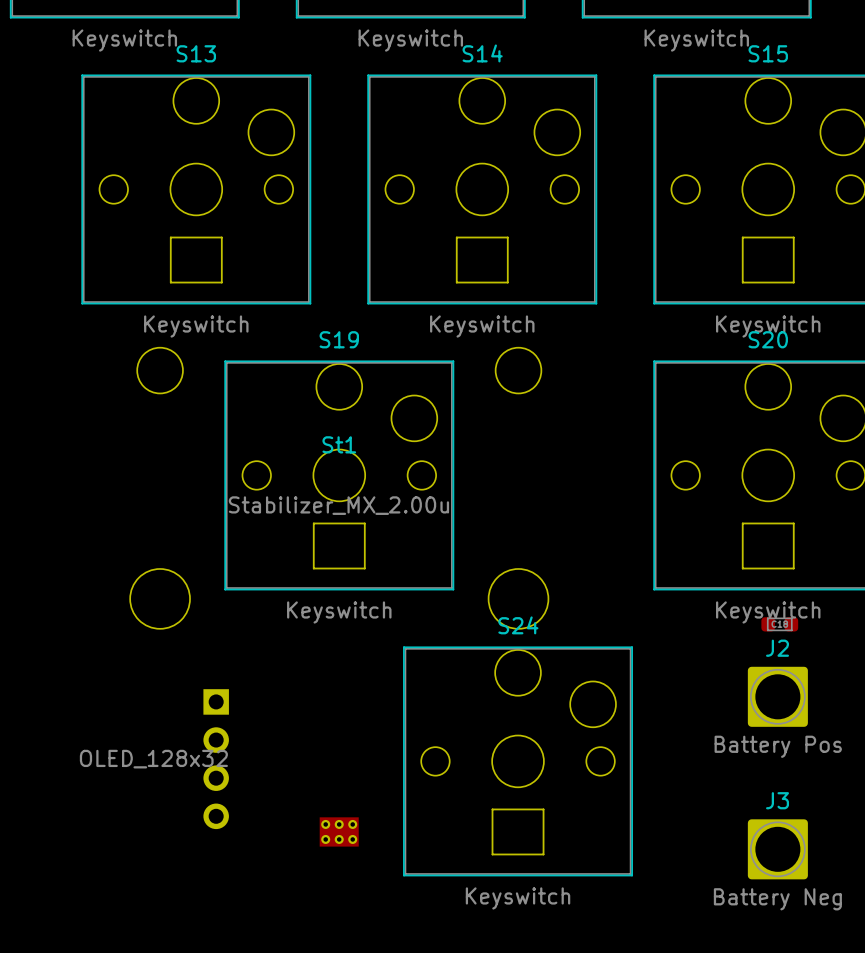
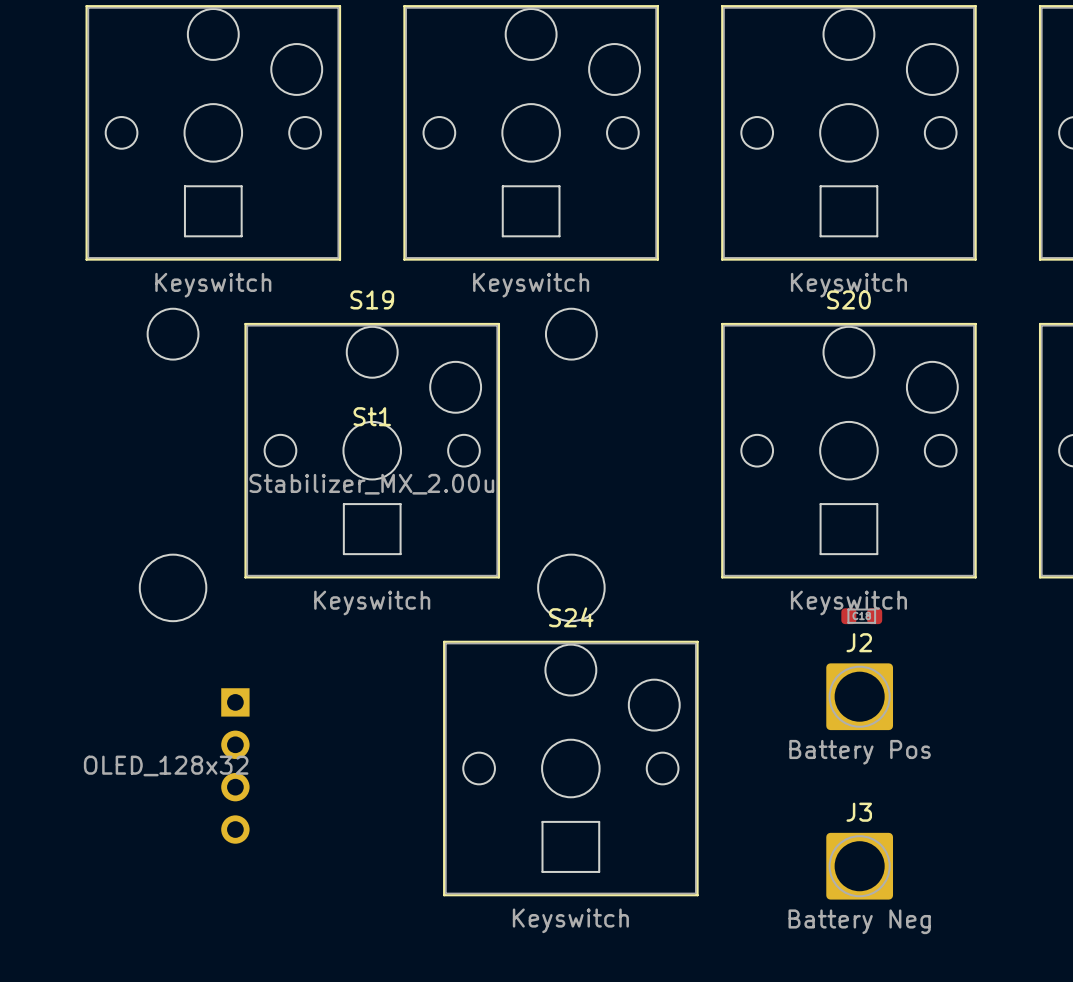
part: (339, 831) -> none

